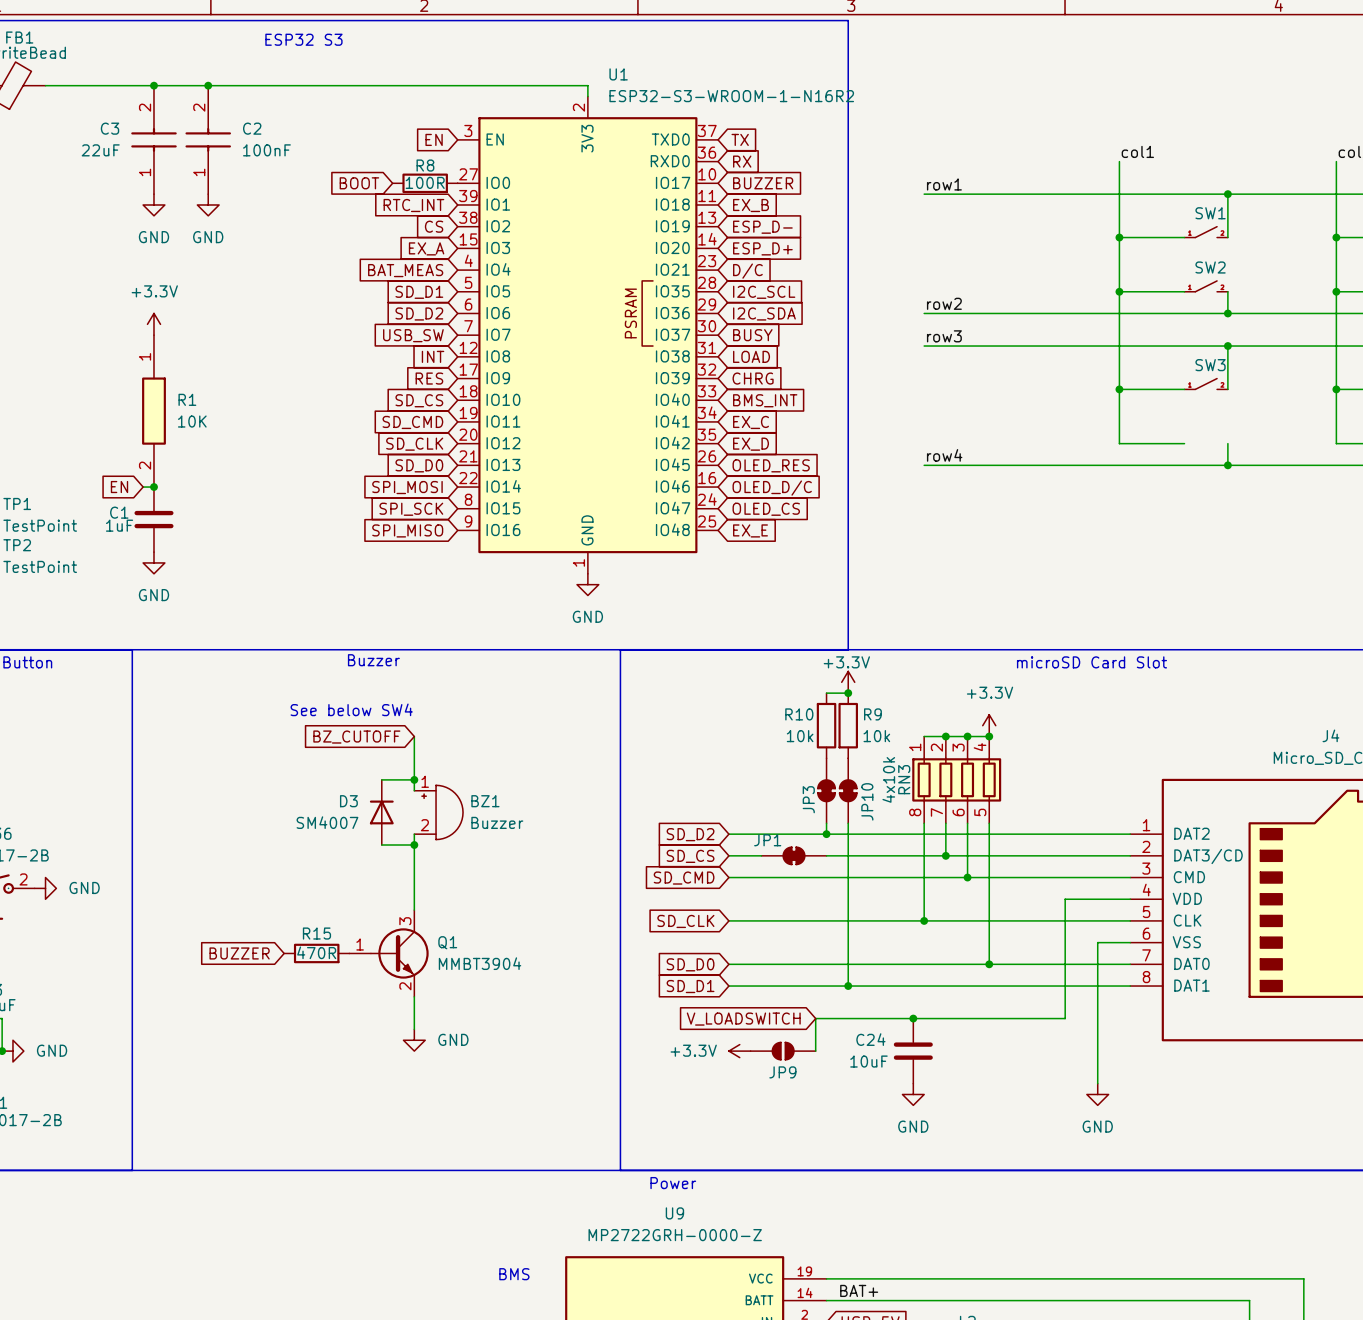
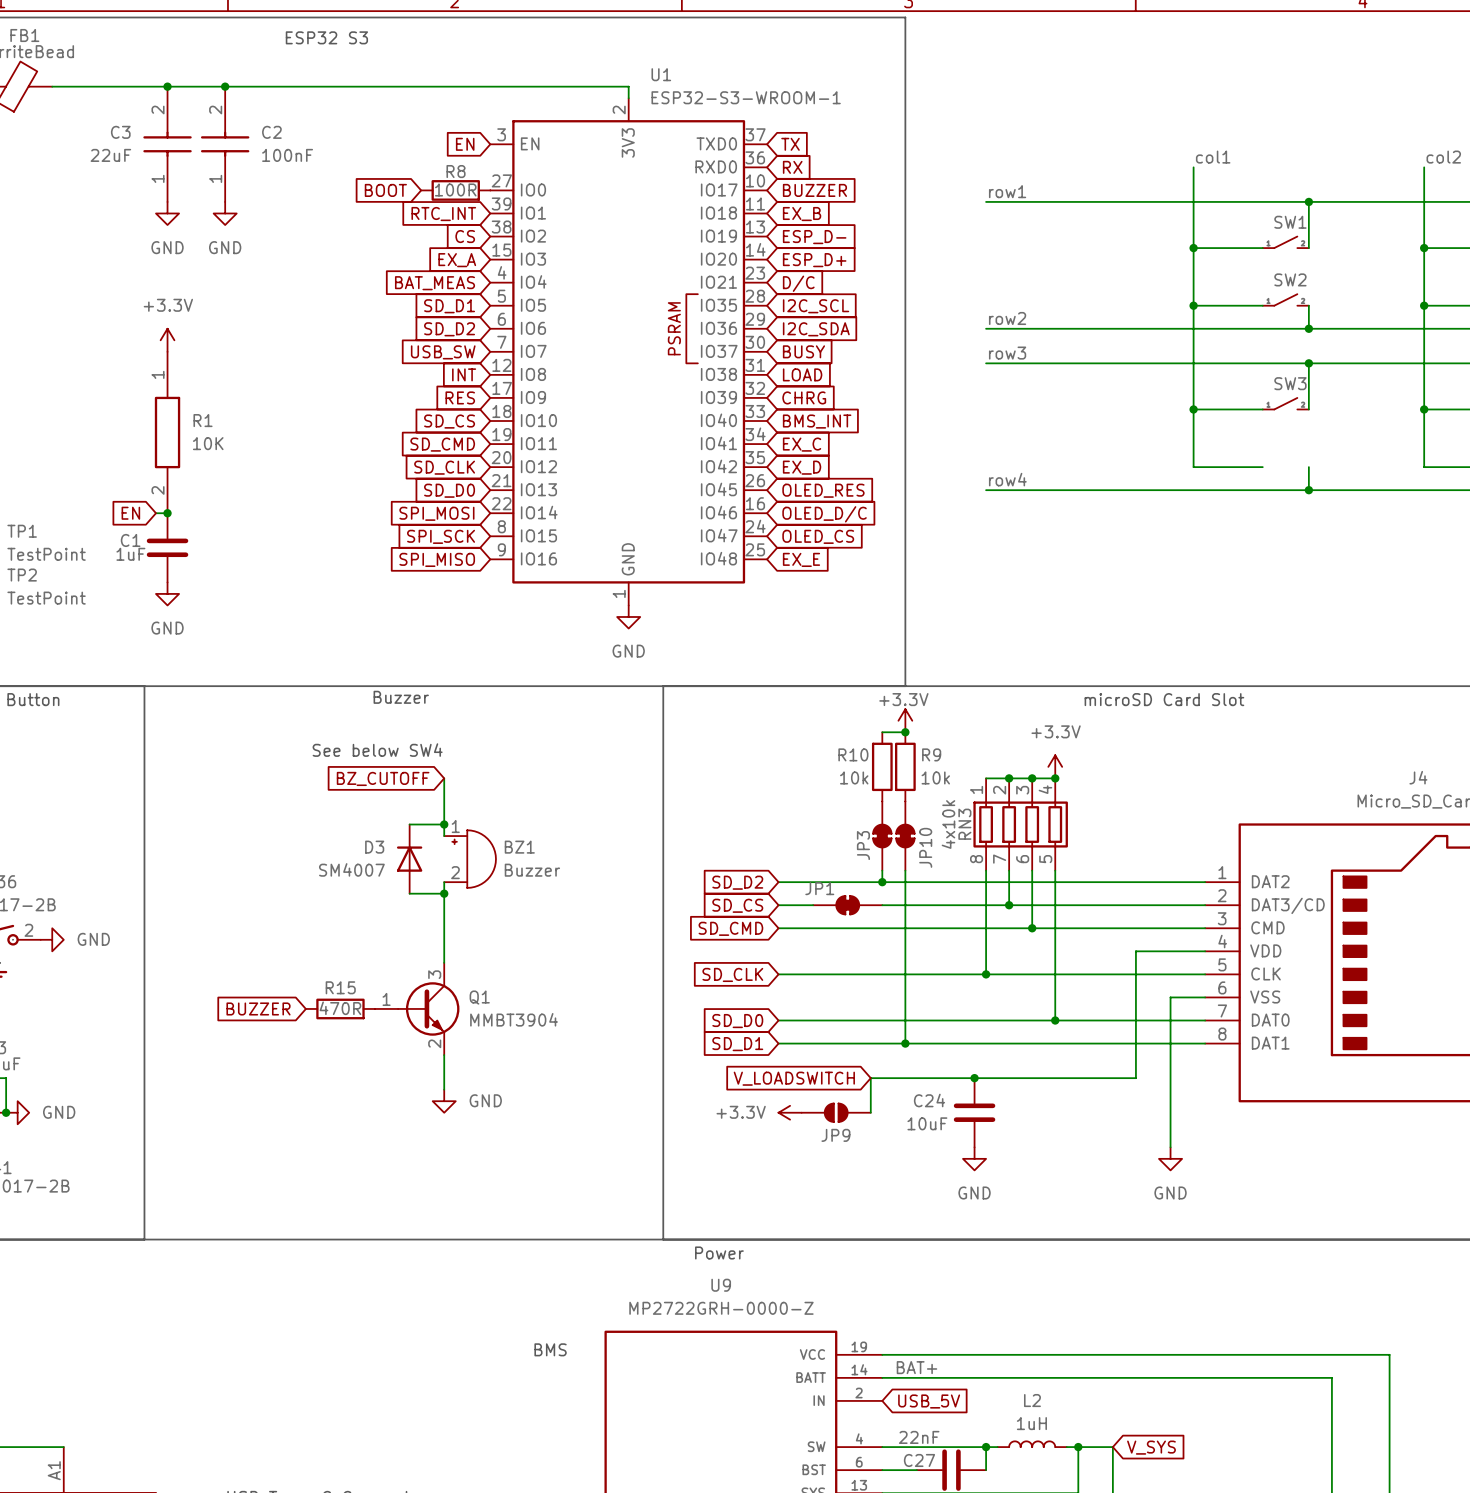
U1 value: ESP32-S3-WROOM-1-N16R2 (731, 96) -> ESP32-S3-WROOM-1 (746, 97)

